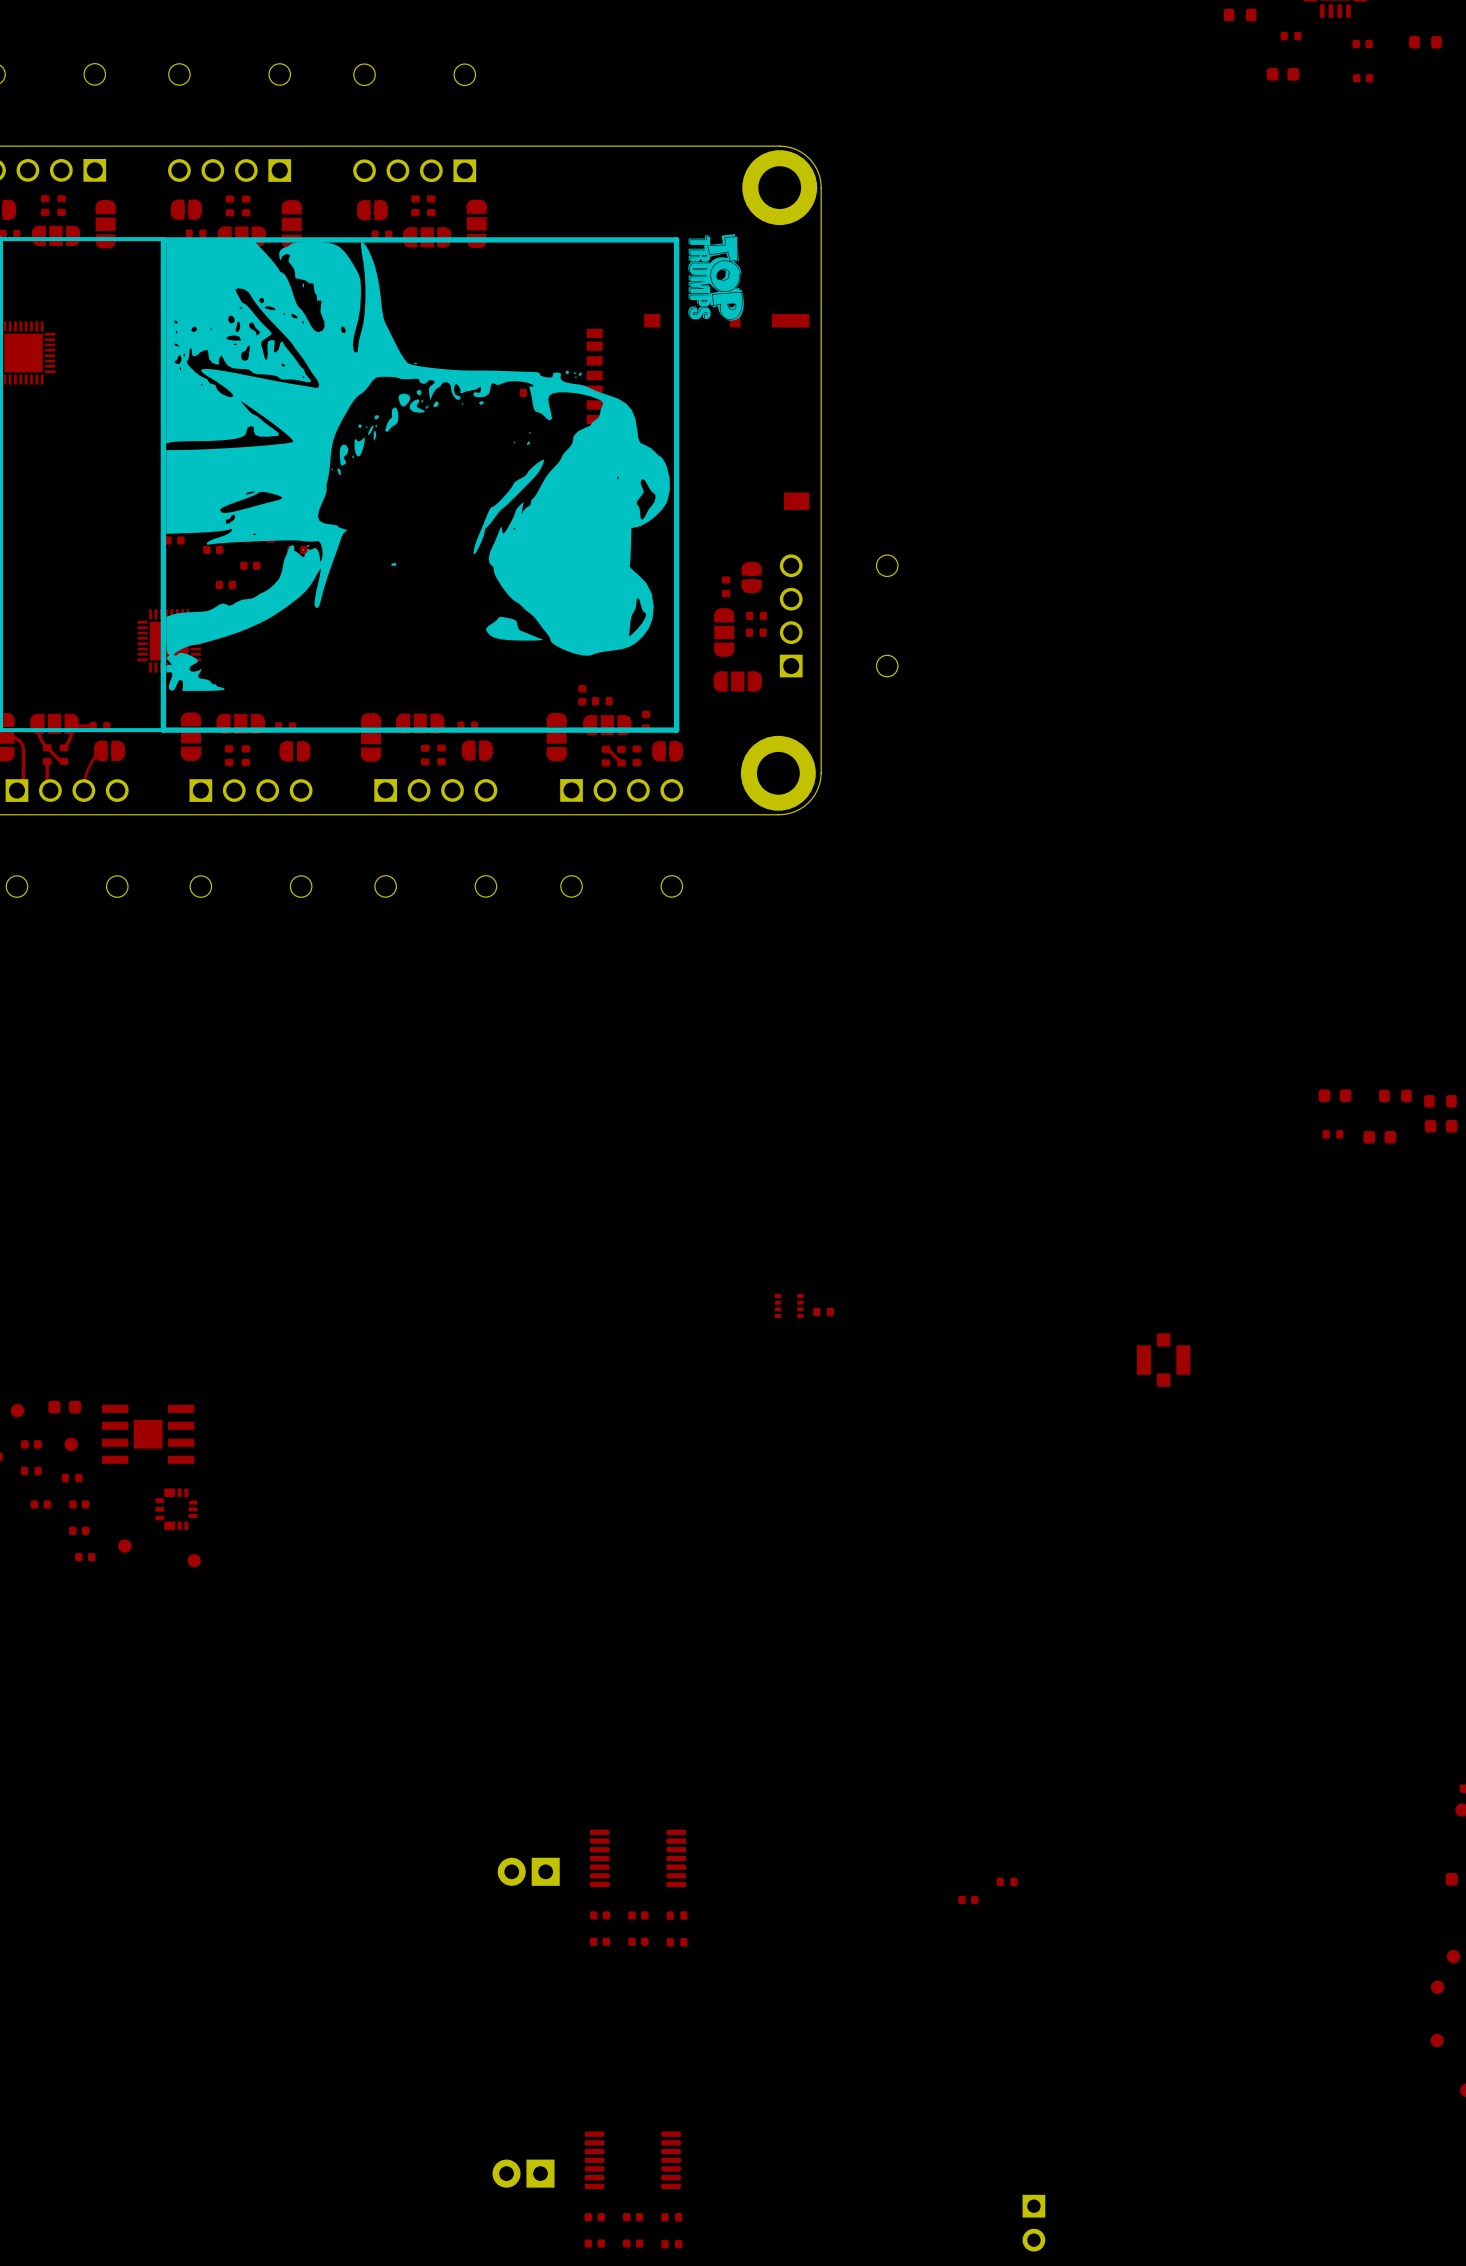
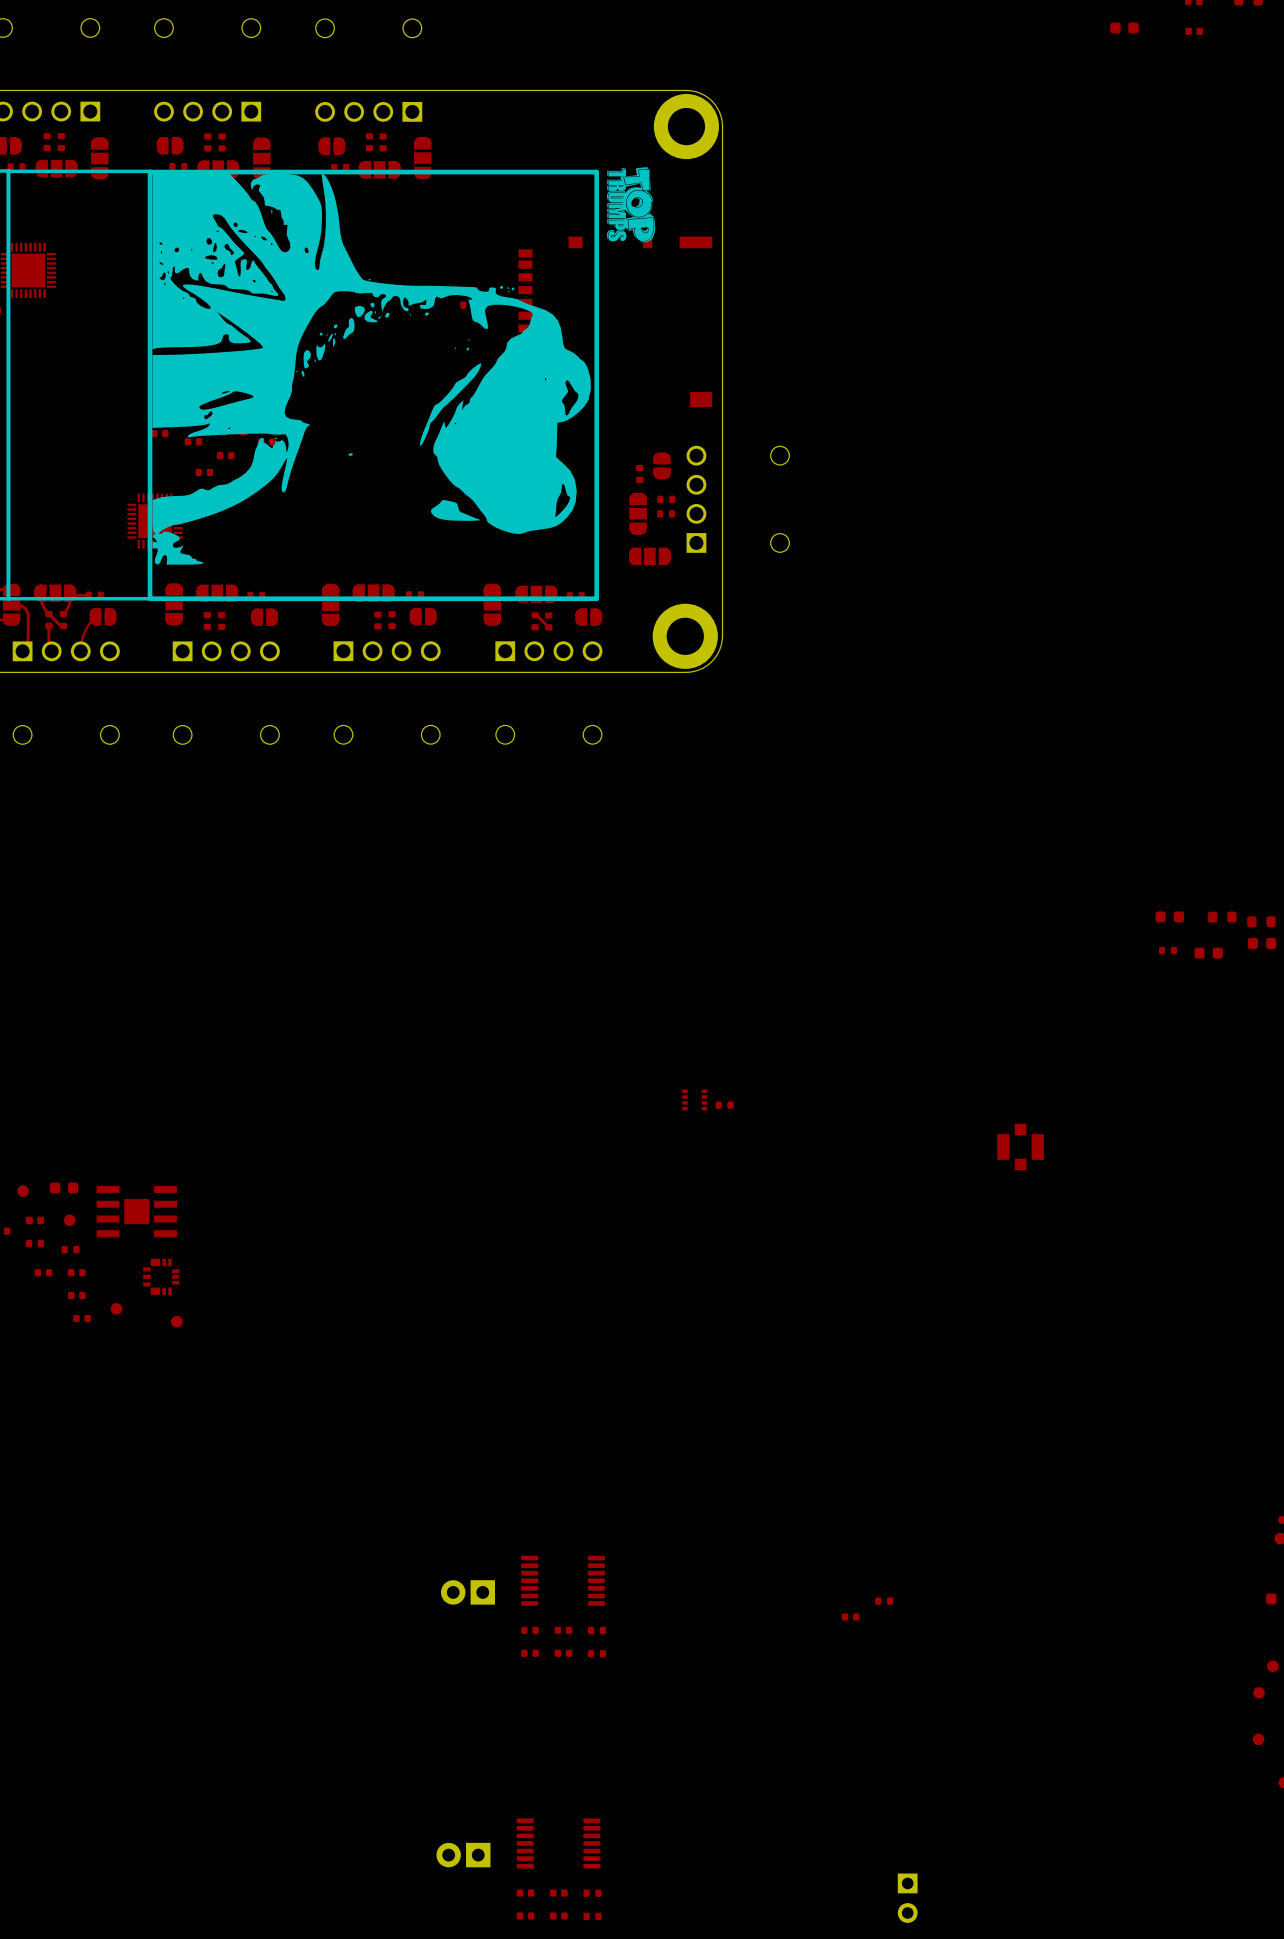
part: (582, 695) -> none
part: (602, 701) -> none
part rotation: 0° (646, 721) -> 90° clockwise (575, 595)
part: (636, 755) -> none

